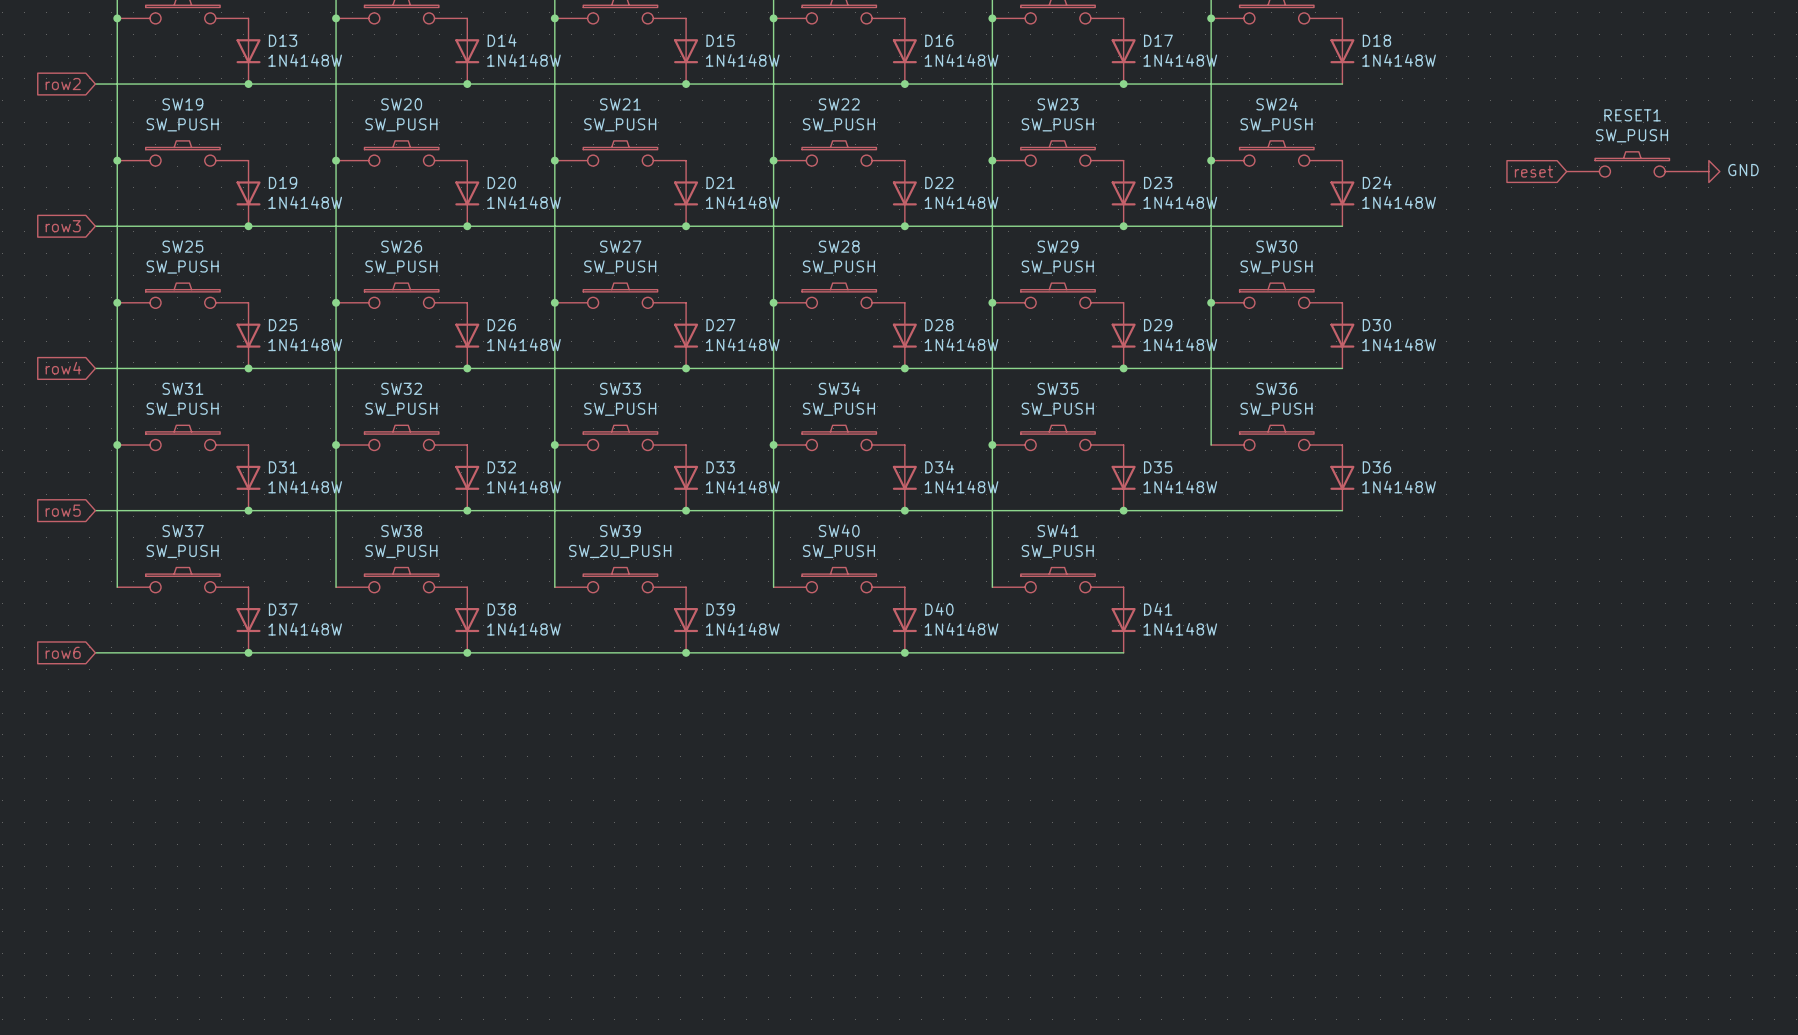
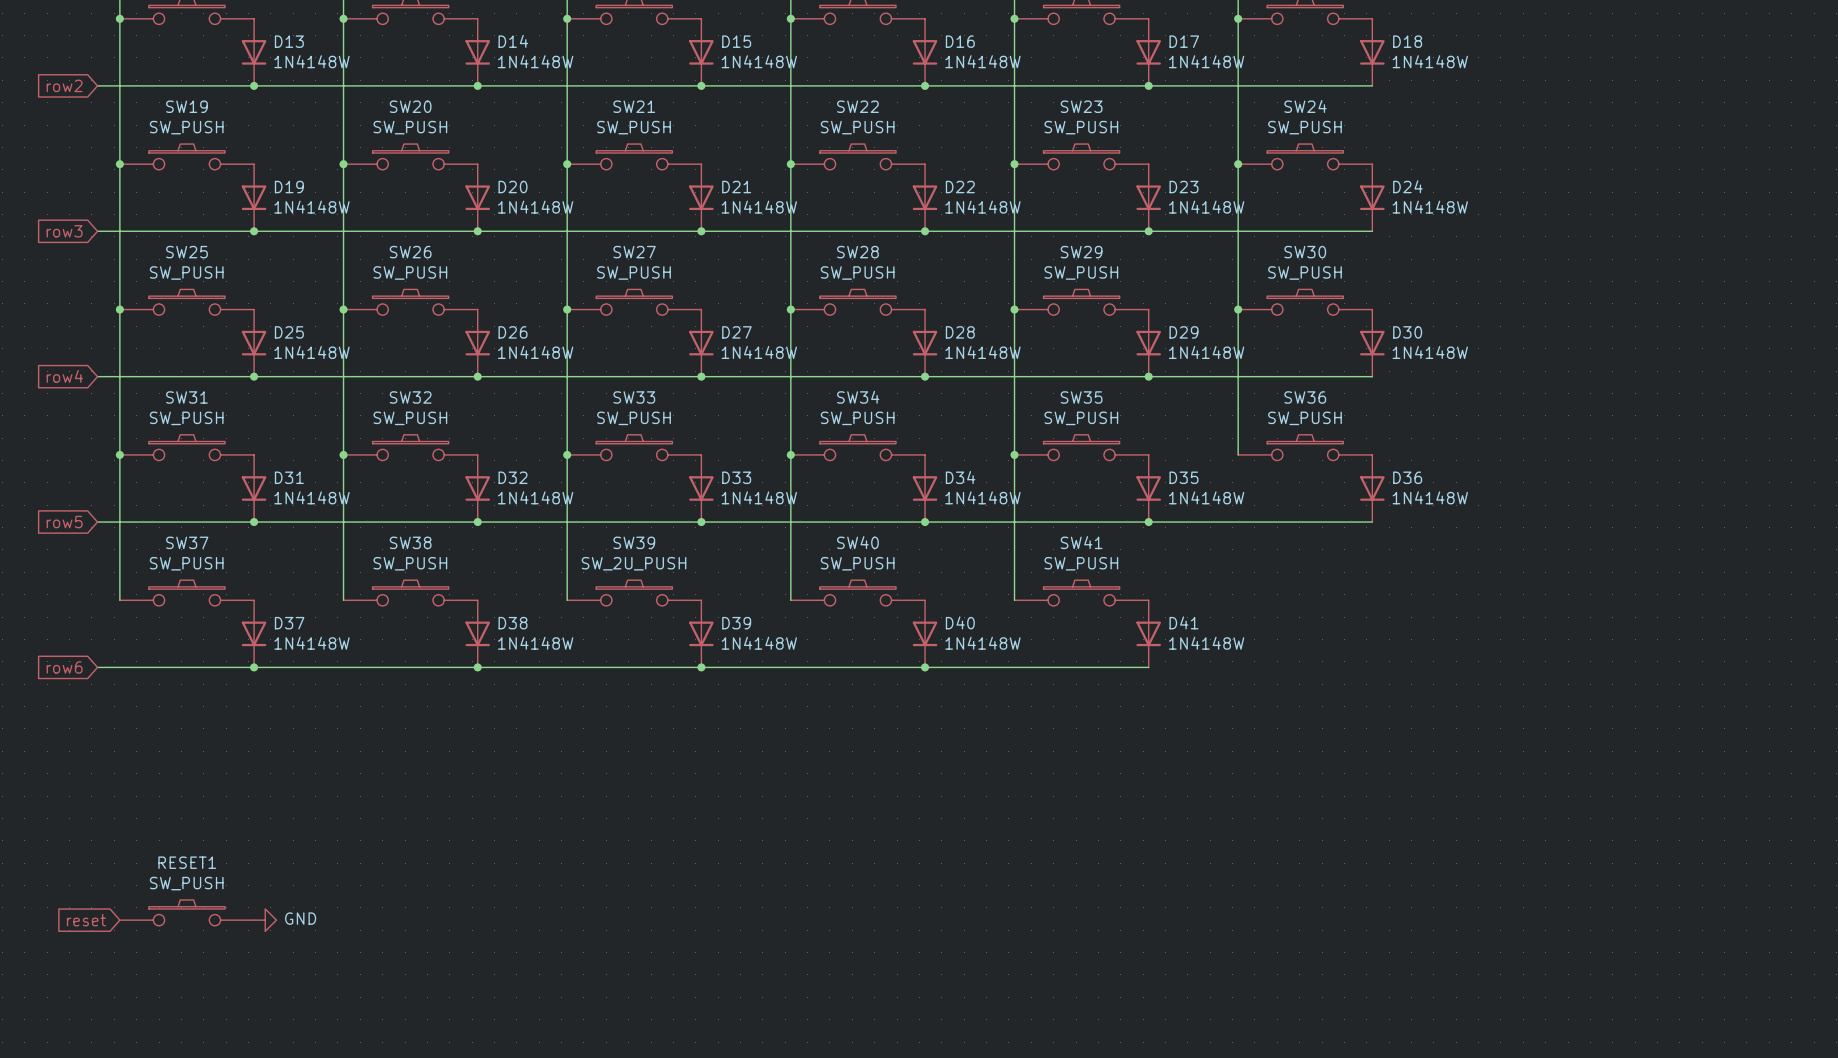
RESET1 position: (1632, 164) -> (186, 912)
global label: reset (1533, 171) -> none
power symbol: GND (1708, 171) -> none
global label: none -> reset (86, 920)
power symbol: none -> GND (265, 920)

